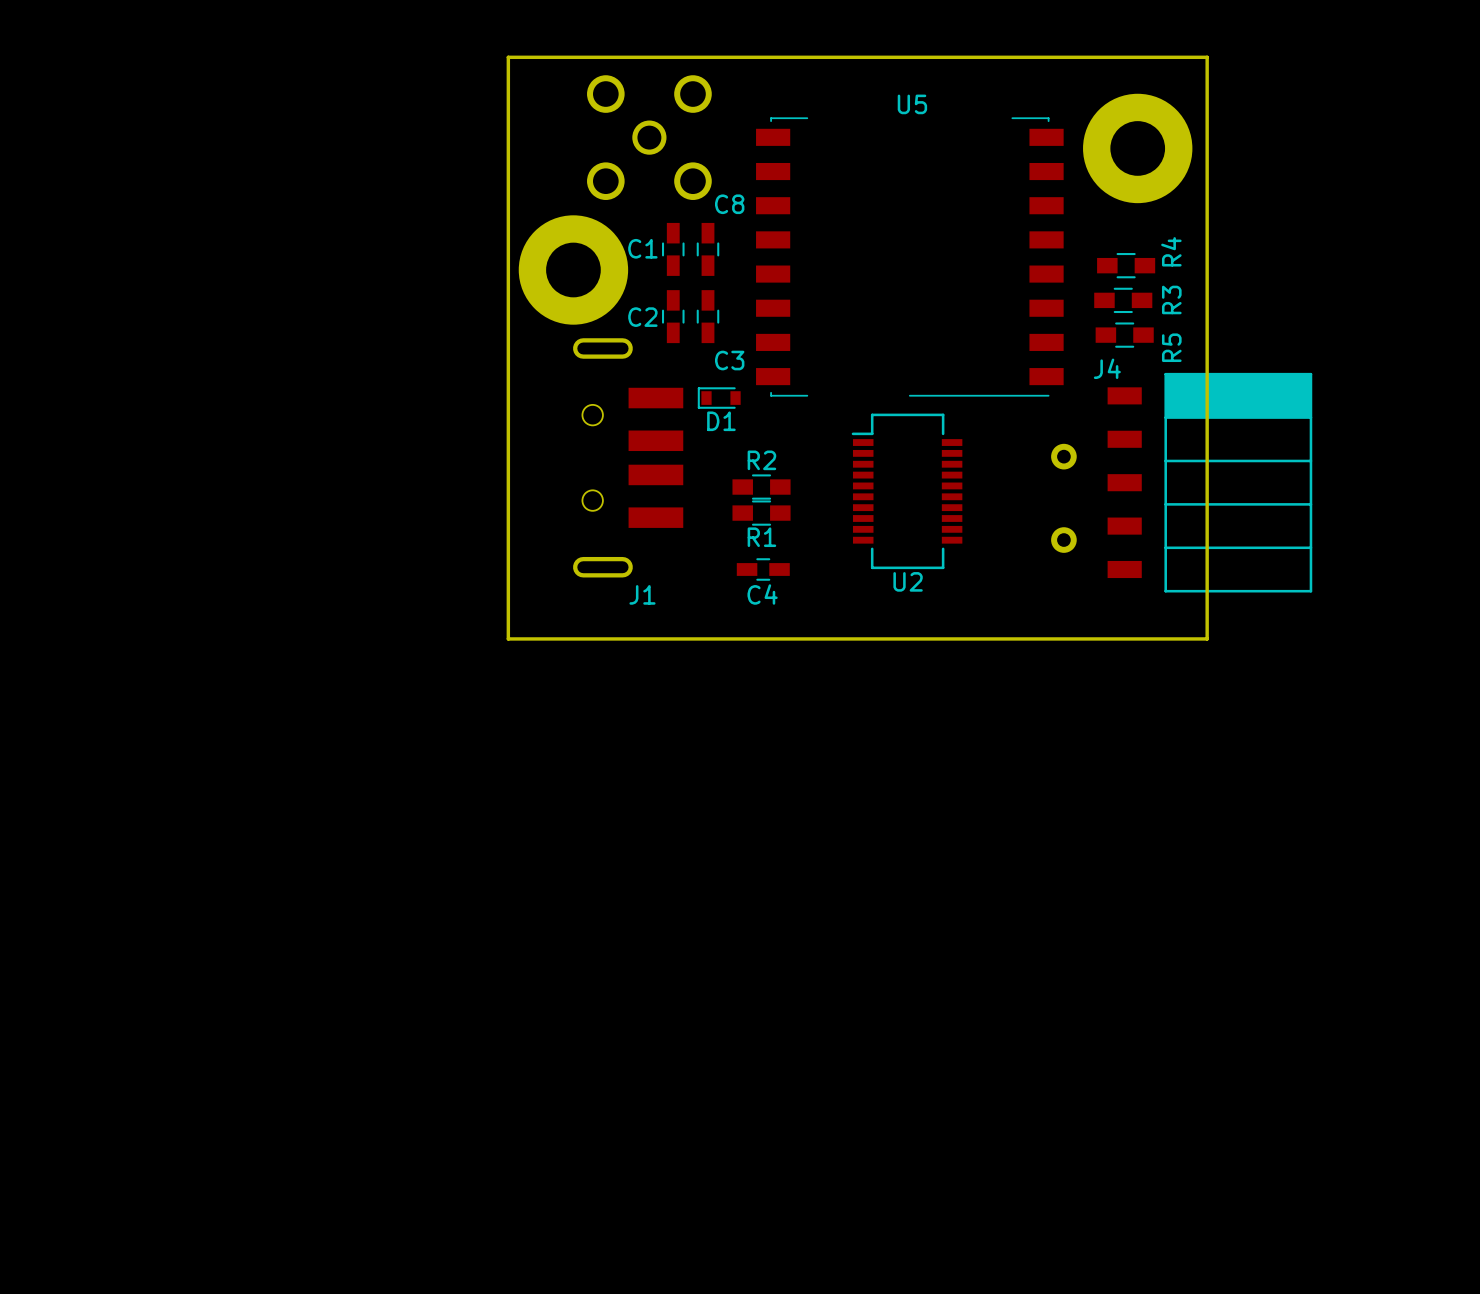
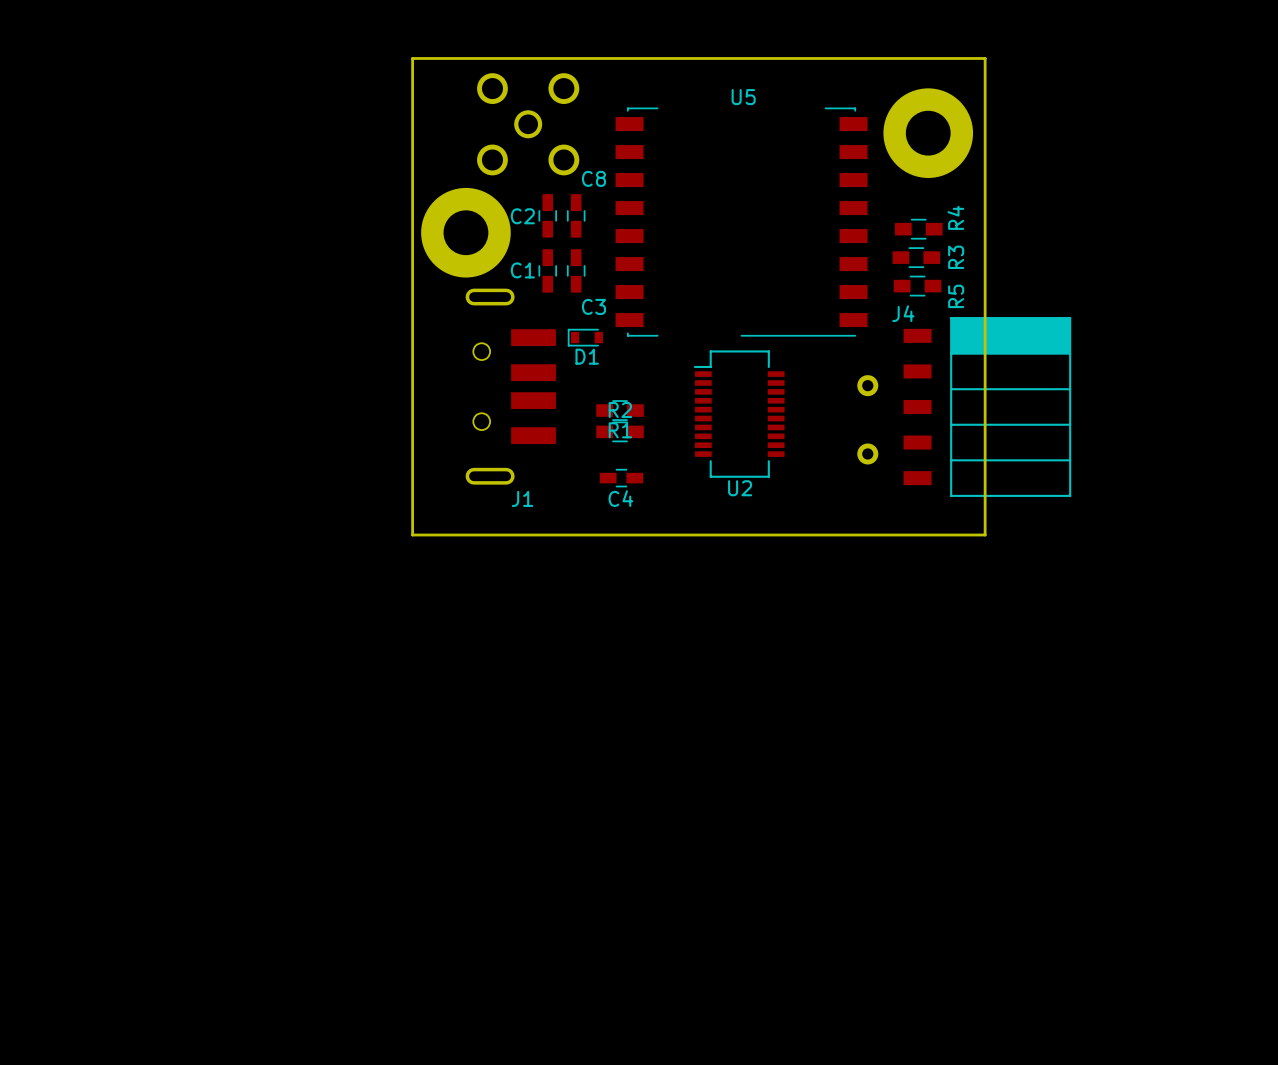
C1 name: C1 (642, 248) -> C2 (522, 216)
C2 name: C2 (642, 317) -> C1 (522, 270)
R2 name: R2 (761, 460) -> R1 (620, 430)
R1 name: R1 (761, 537) -> R2 (620, 410)

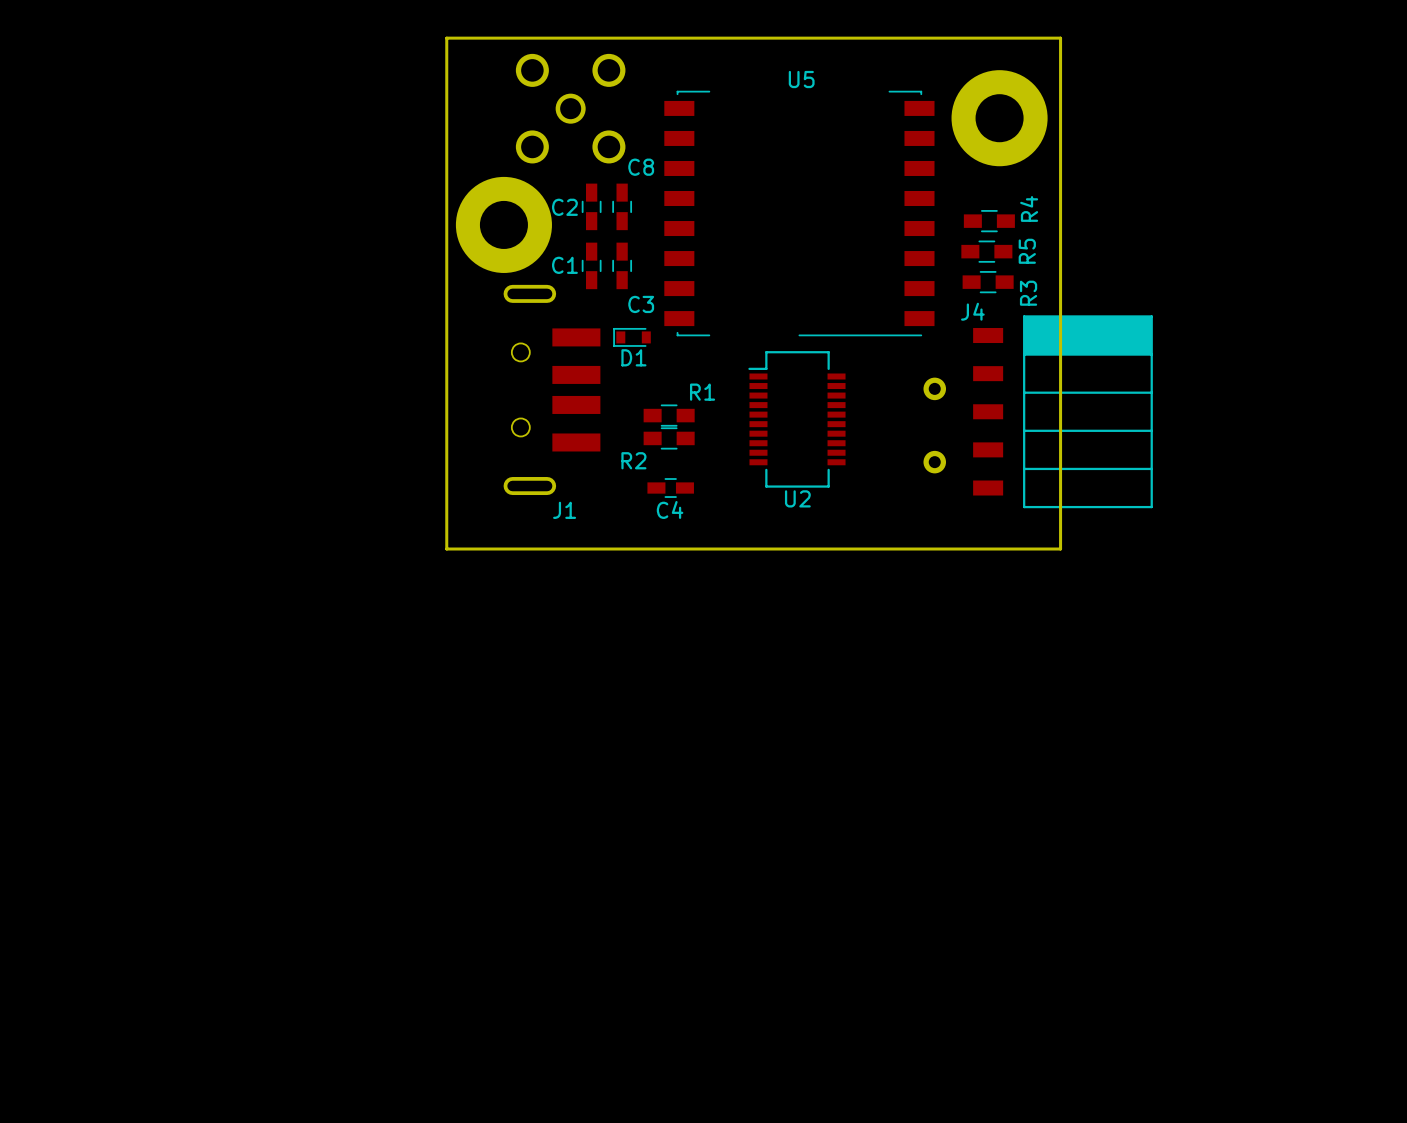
R3 name position: R3 (956, 257) -> R3 (1028, 293)
R5 name position: R5 (956, 296) -> R5 (1027, 251)
R2 name position: R2 (620, 410) -> R2 (633, 460)
R1 name position: R1 (620, 430) -> R1 (702, 392)

